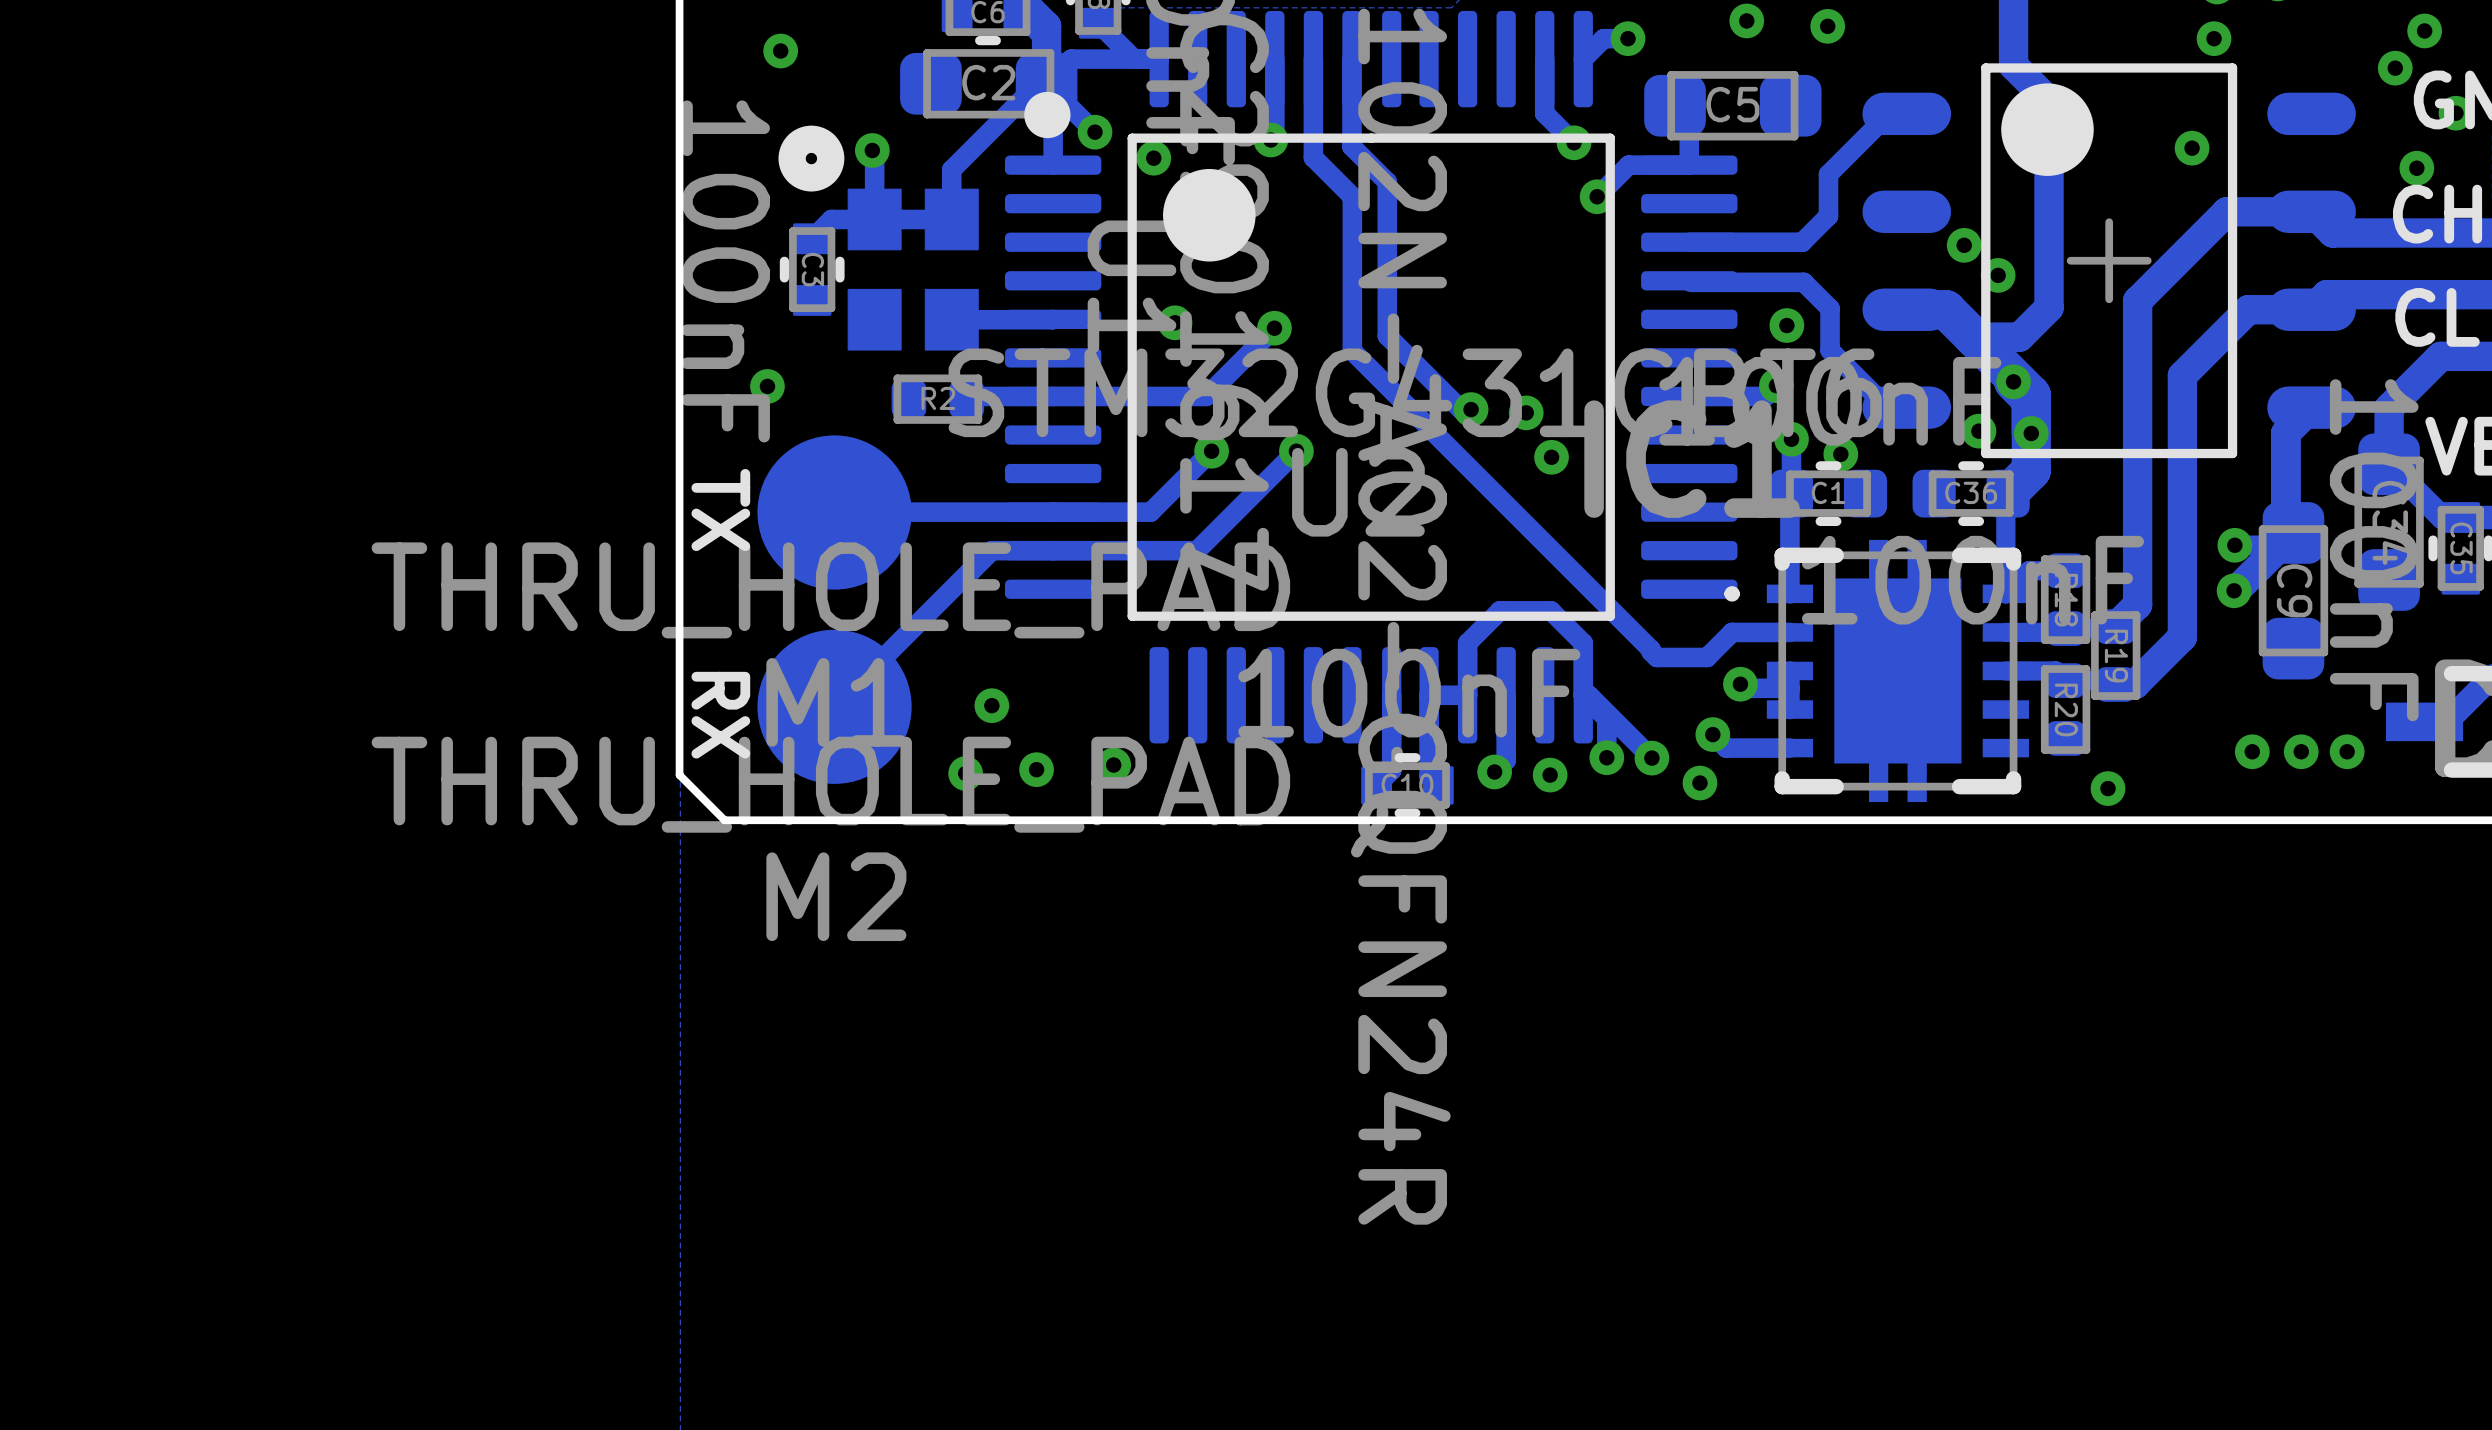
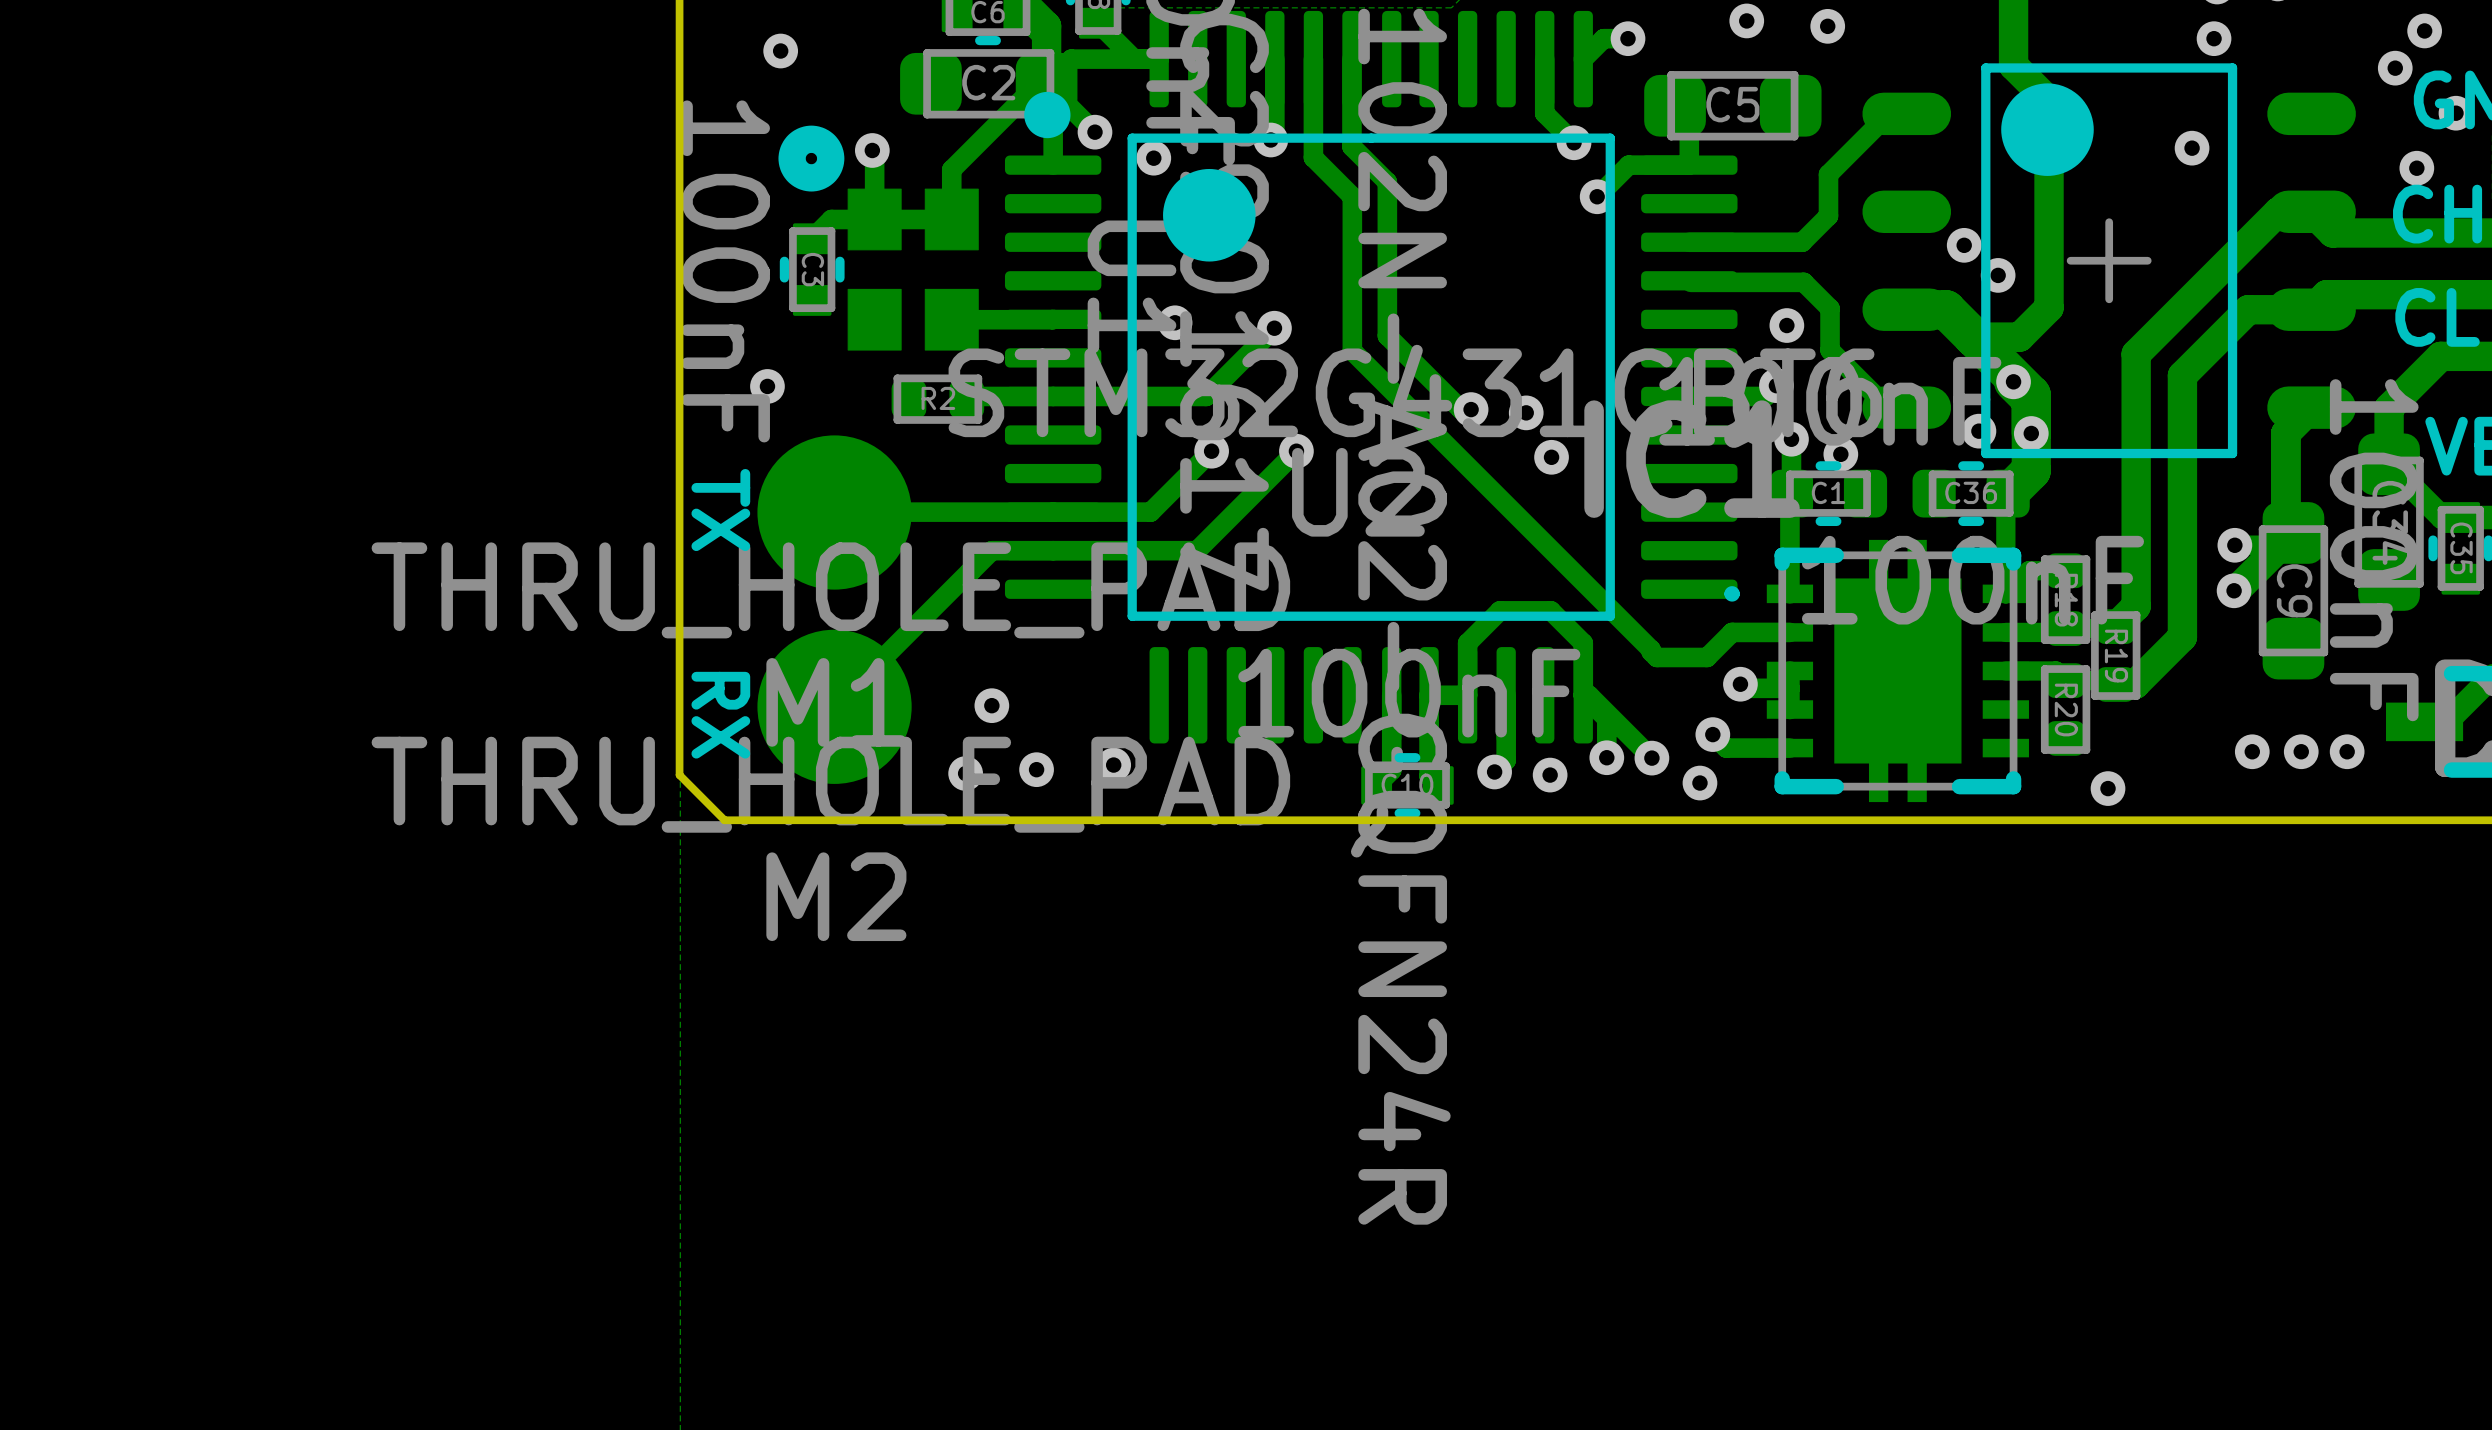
track: (2278, 211) (2226, 211) (2137, 300) (2136, 606) -> (2278, 211) (2136, 354) (2136, 606)

